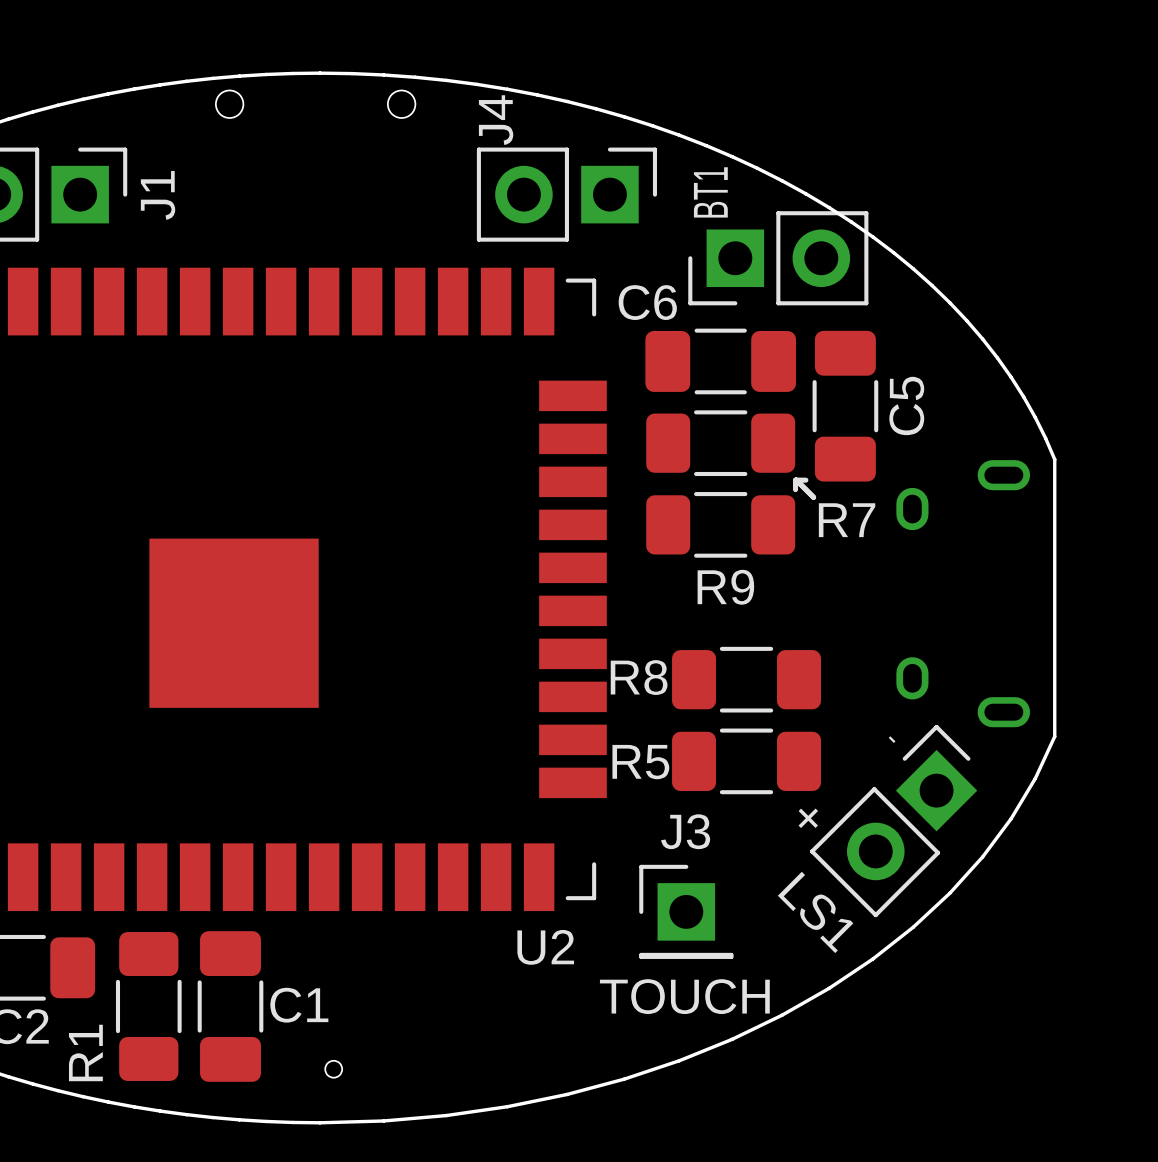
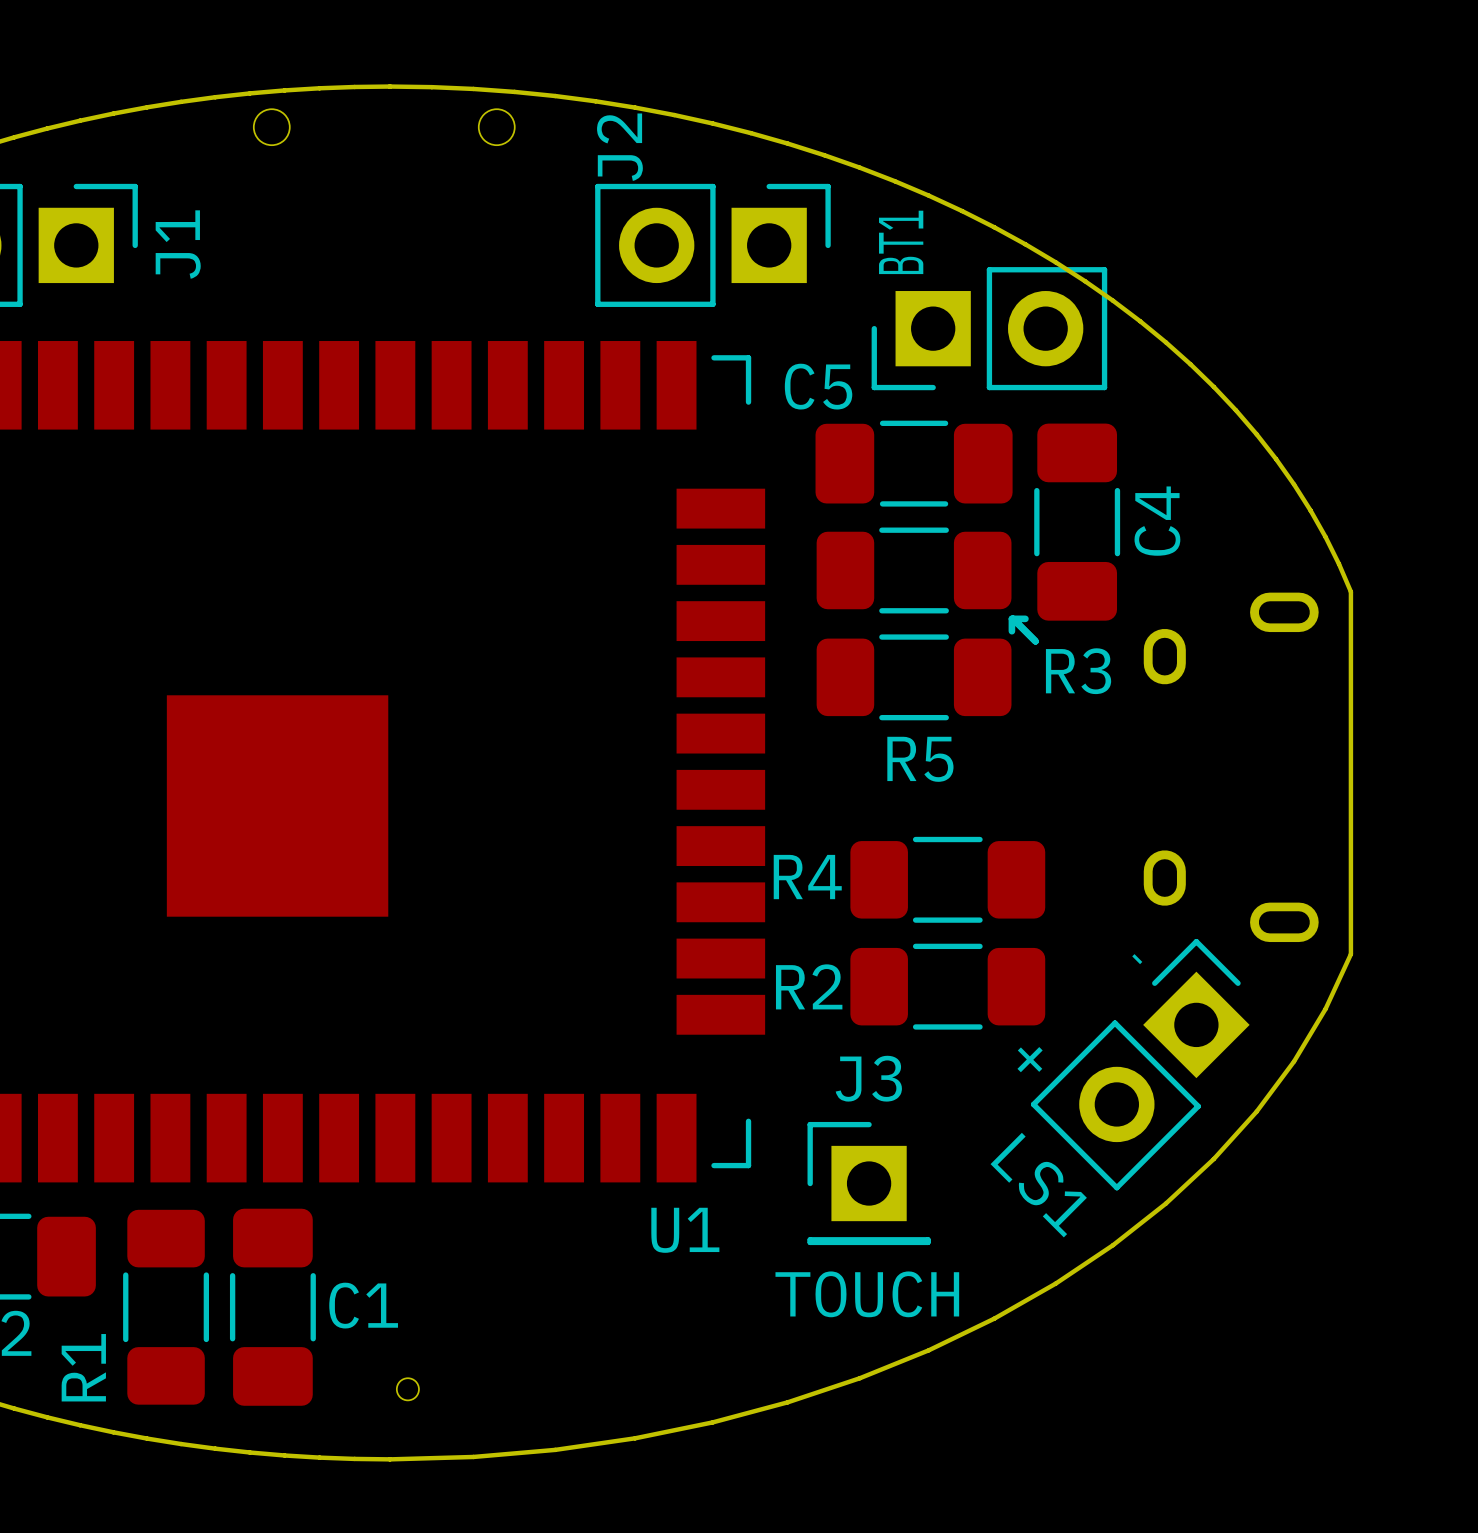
J4 name: J4 (496, 120) -> J2 (619, 147)
C6 name: C6 (647, 302) -> C5 (818, 386)
C5 name: C5 (906, 405) -> C4 (1157, 521)
R7 name: R7 (847, 520) -> R3 (1078, 671)
R9 name: R9 (725, 587) -> R5 (920, 759)
R8 name: R8 (639, 677) -> R4 (807, 877)
R5 name: R5 (640, 762) -> R2 (809, 986)
U2 name: U2 (545, 947) -> U1 (685, 1230)

